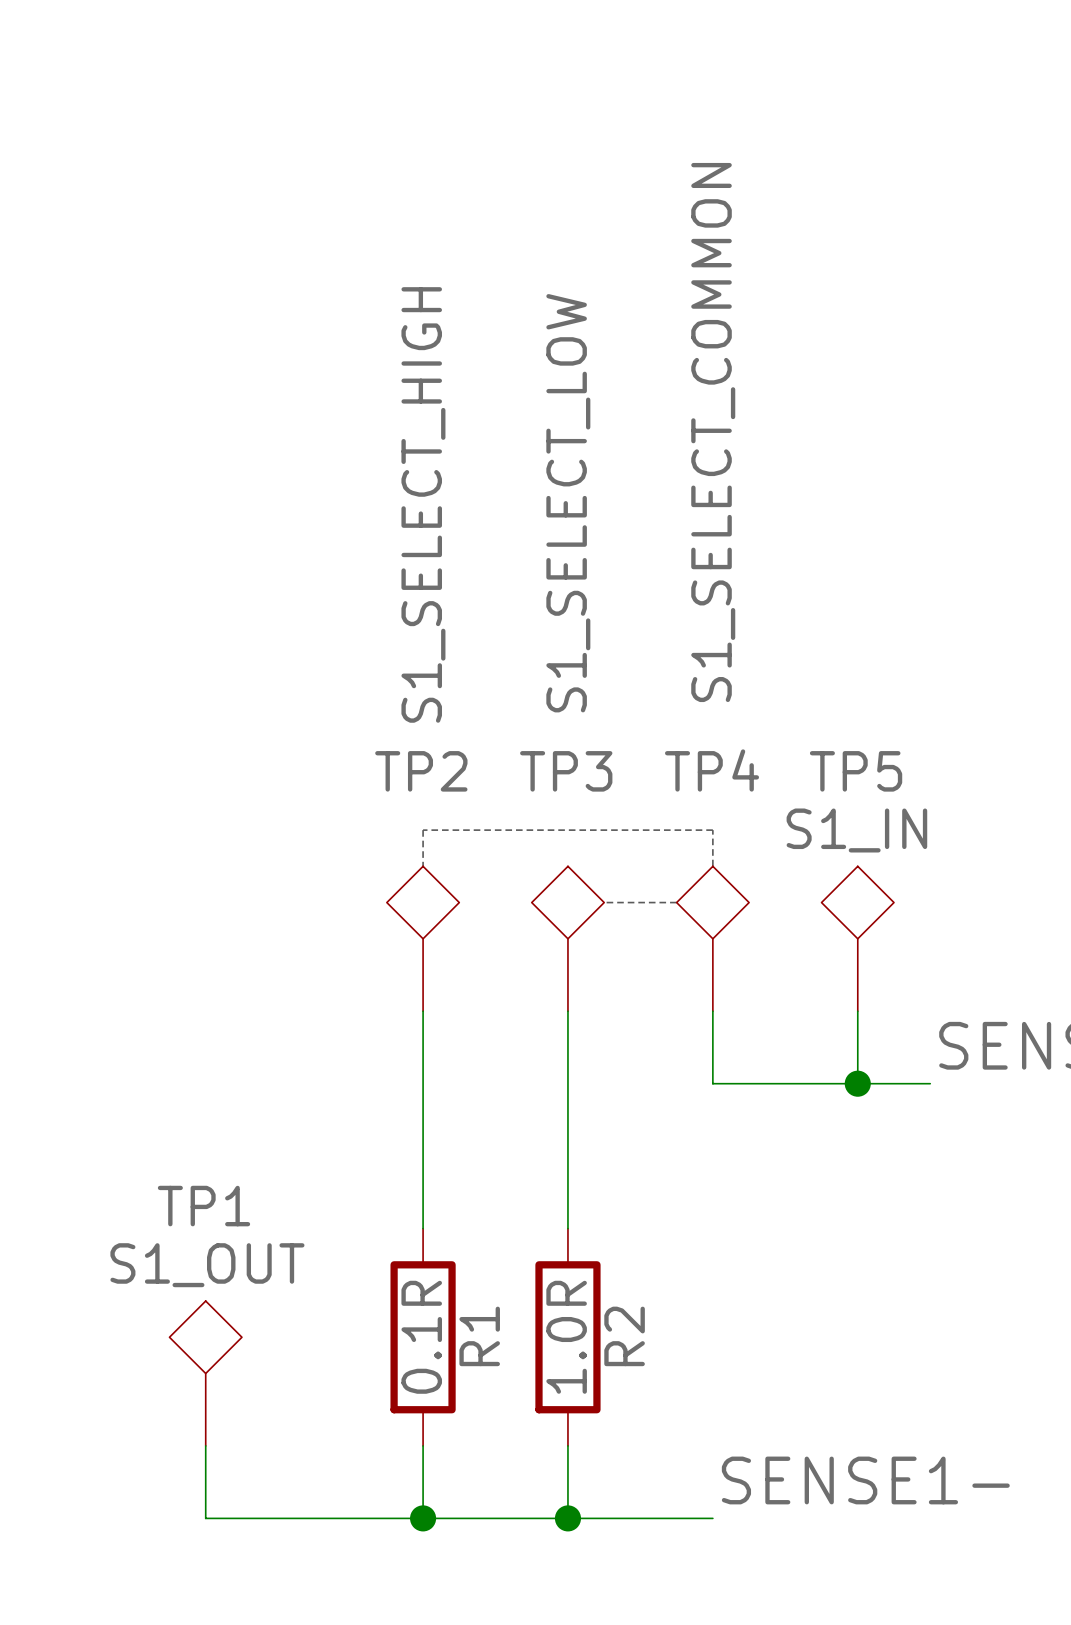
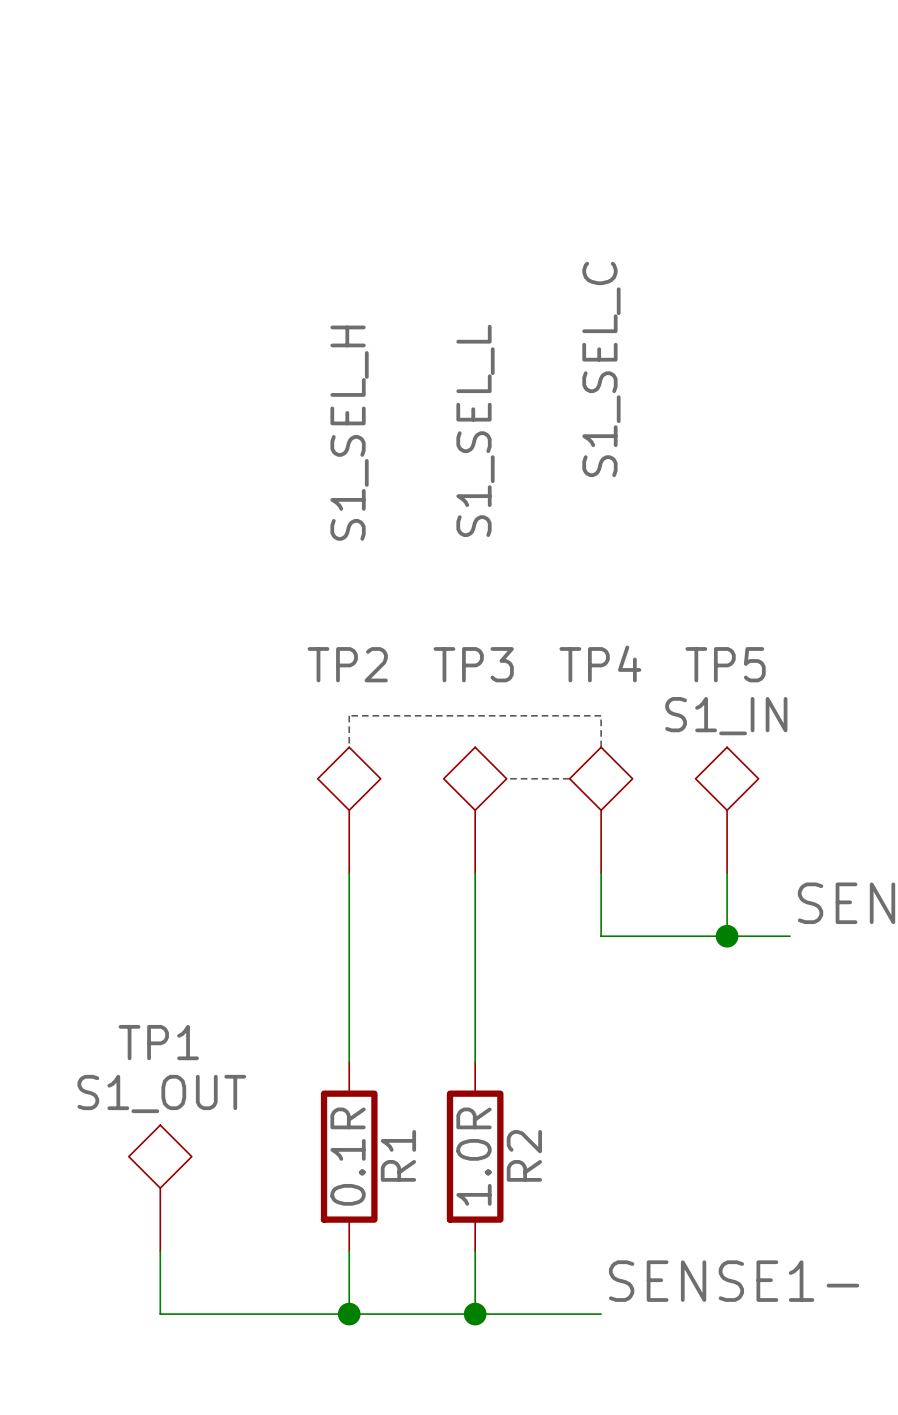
TP4 value: S1_SELECT_COMMON (713, 432) -> S1_SEL_C (601, 369)
TP3 value: S1_SELECT_LOW (568, 503) -> S1_SEL_L (475, 430)
TP2 value: S1_SELECT_HIGH (423, 504) -> S1_SEL_H (349, 433)

